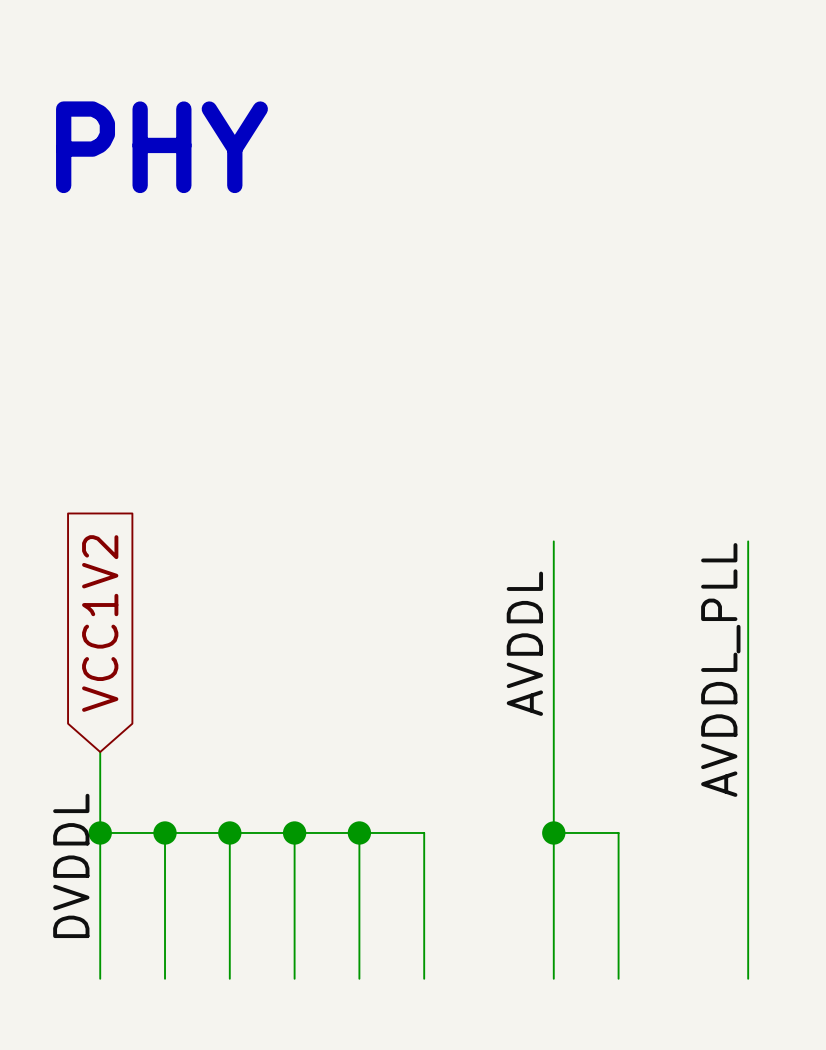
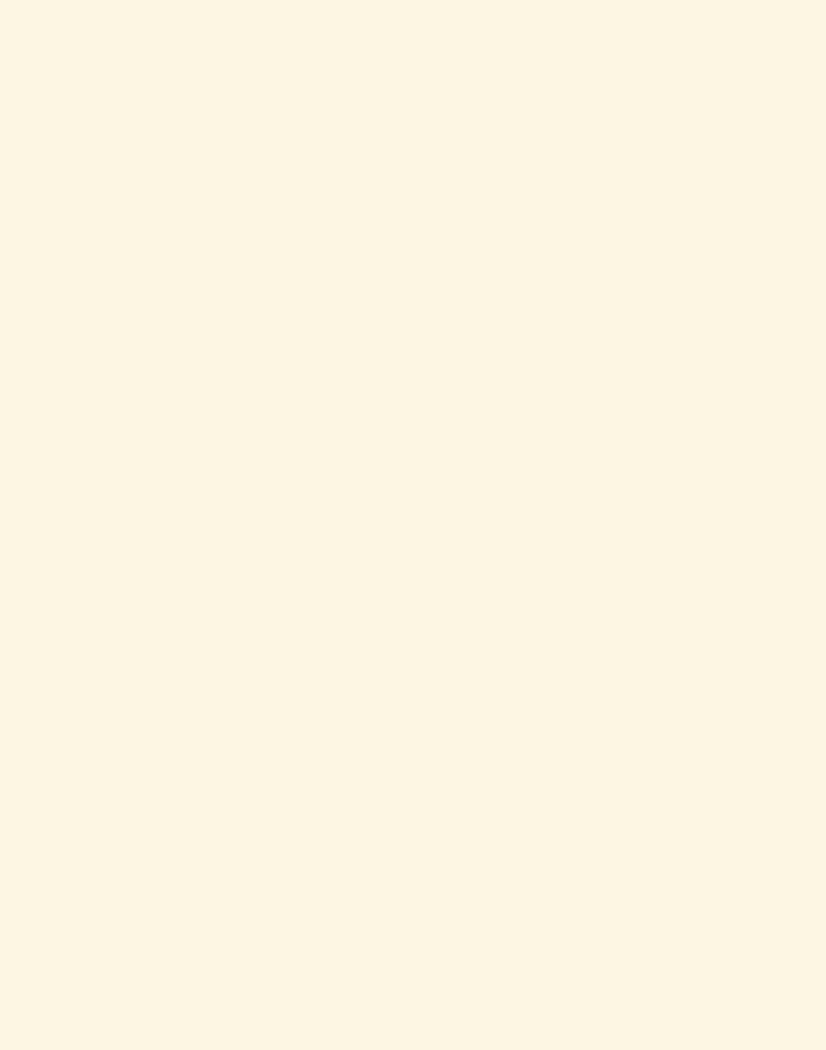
text: PHY (161, 147) -> none
wire: (553, 541) (553, 978) -> none
wire: (748, 541) (748, 978) -> none
global label: VCC1V2 (100, 623) -> none
label: AVDDL (524, 643) -> none
label: AVDDL_PLL (720, 669) -> none
wire: (100, 751) (100, 978) -> none
wire: (100, 832) (424, 832) (424, 978) -> none
junction: (100, 832) -> none
wire: (165, 832) (165, 978) -> none
junction: (165, 832) -> none
wire: (229, 832) (229, 978) -> none
junction: (229, 832) -> none
wire: (294, 832) (294, 978) -> none
junction: (294, 832) -> none
wire: (359, 832) (359, 978) -> none
junction: (359, 832) -> none
wire: (553, 832) (618, 832) (618, 978) -> none
junction: (553, 832) -> none
label: DVDDL (71, 865) -> none

